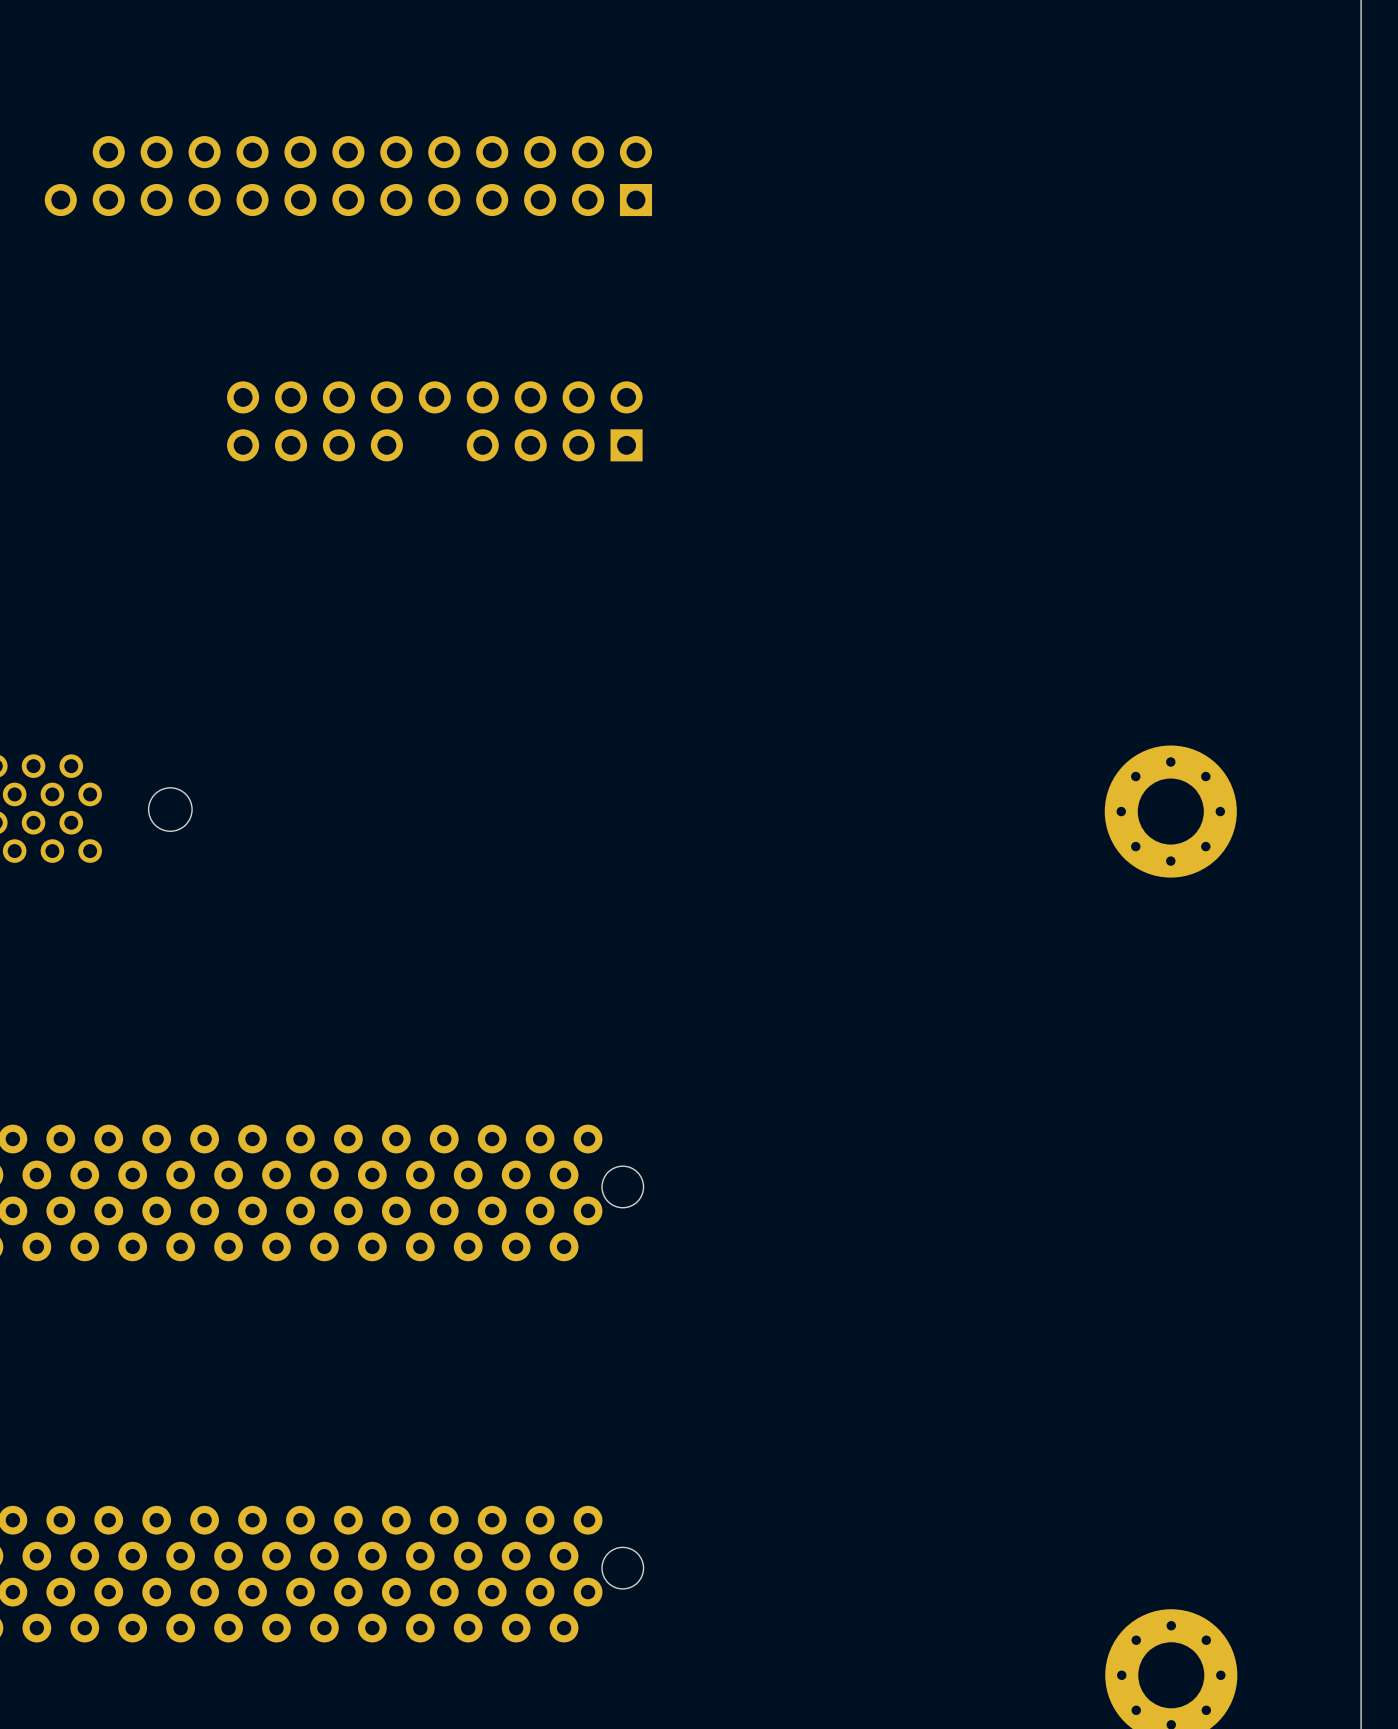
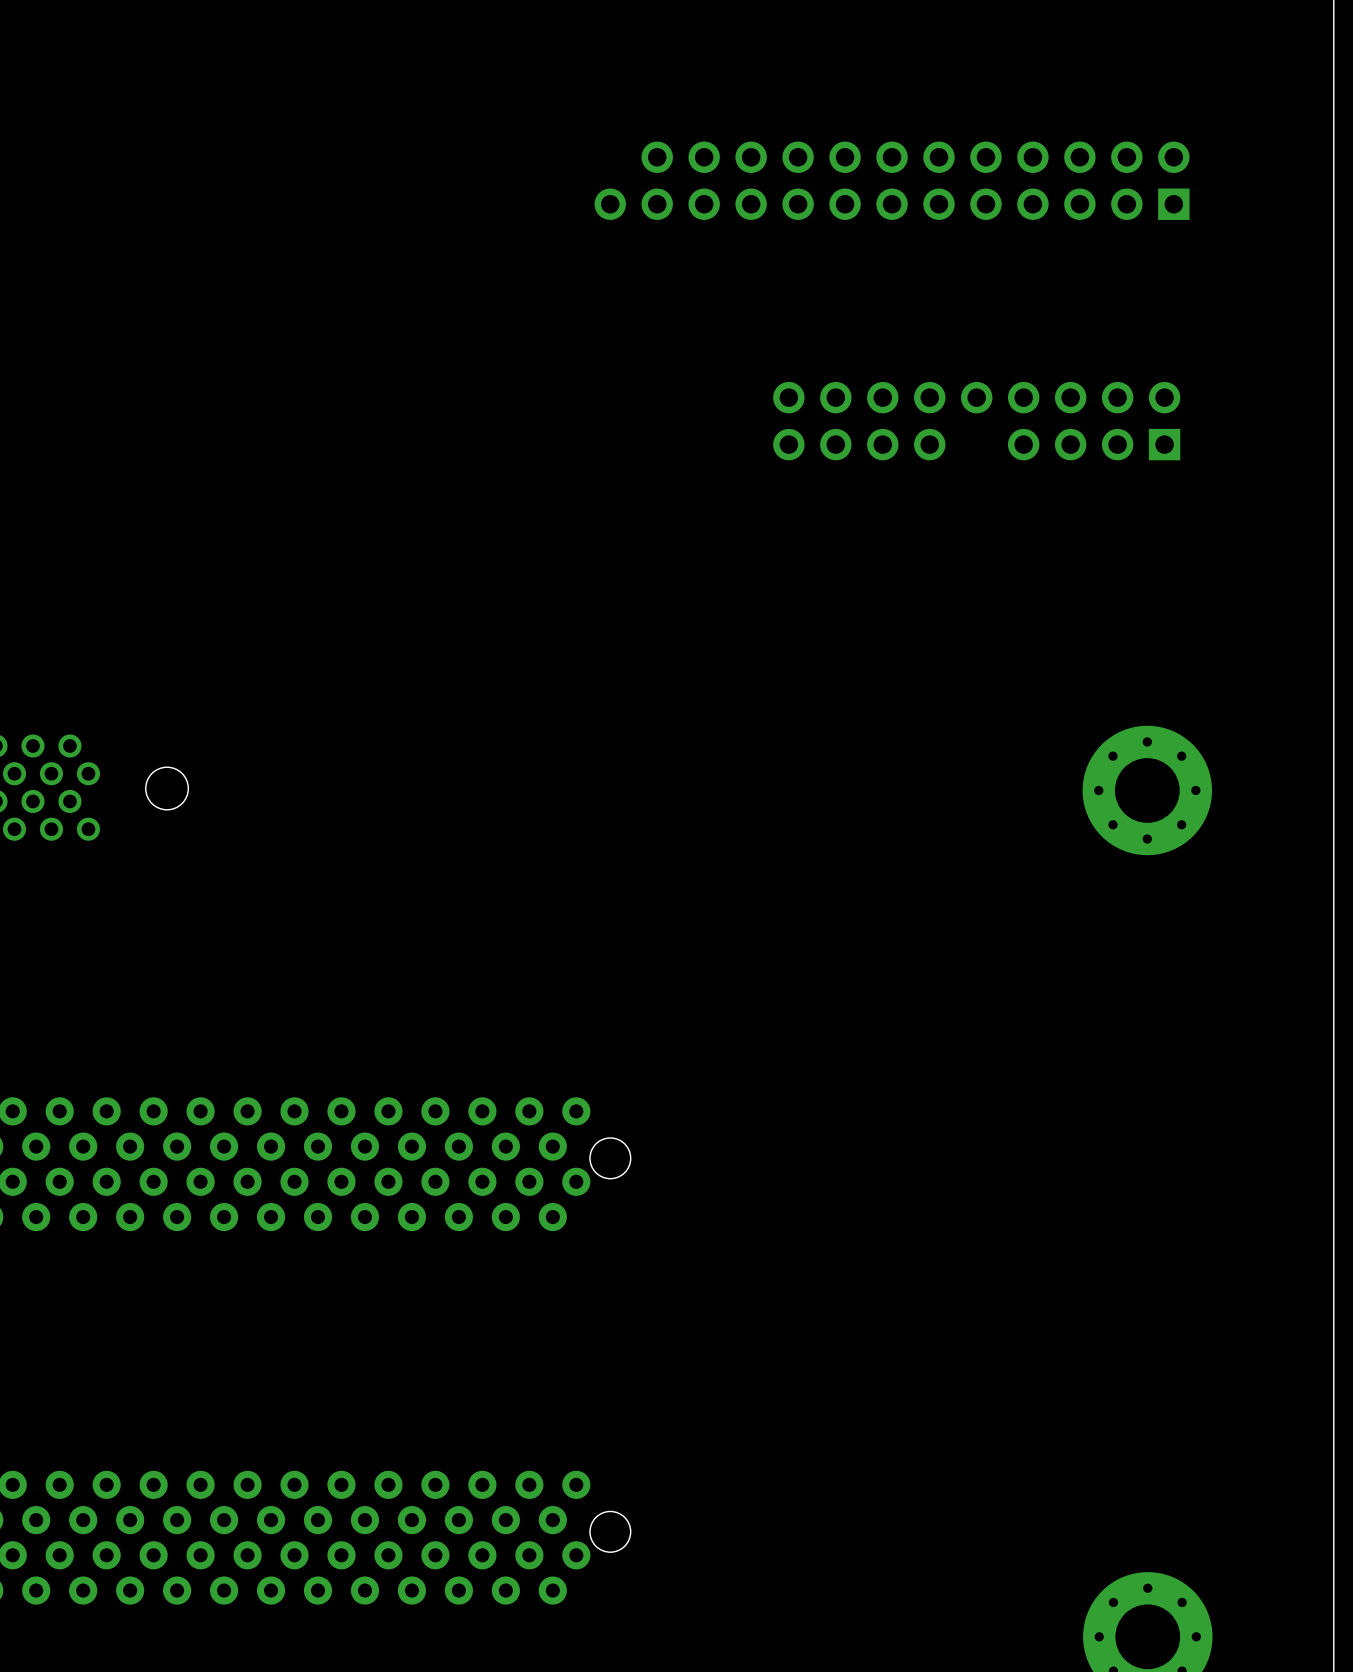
part: (348, 176) -> none
part: none -> (892, 180)
part: (434, 421) -> none
part: none -> (976, 421)

